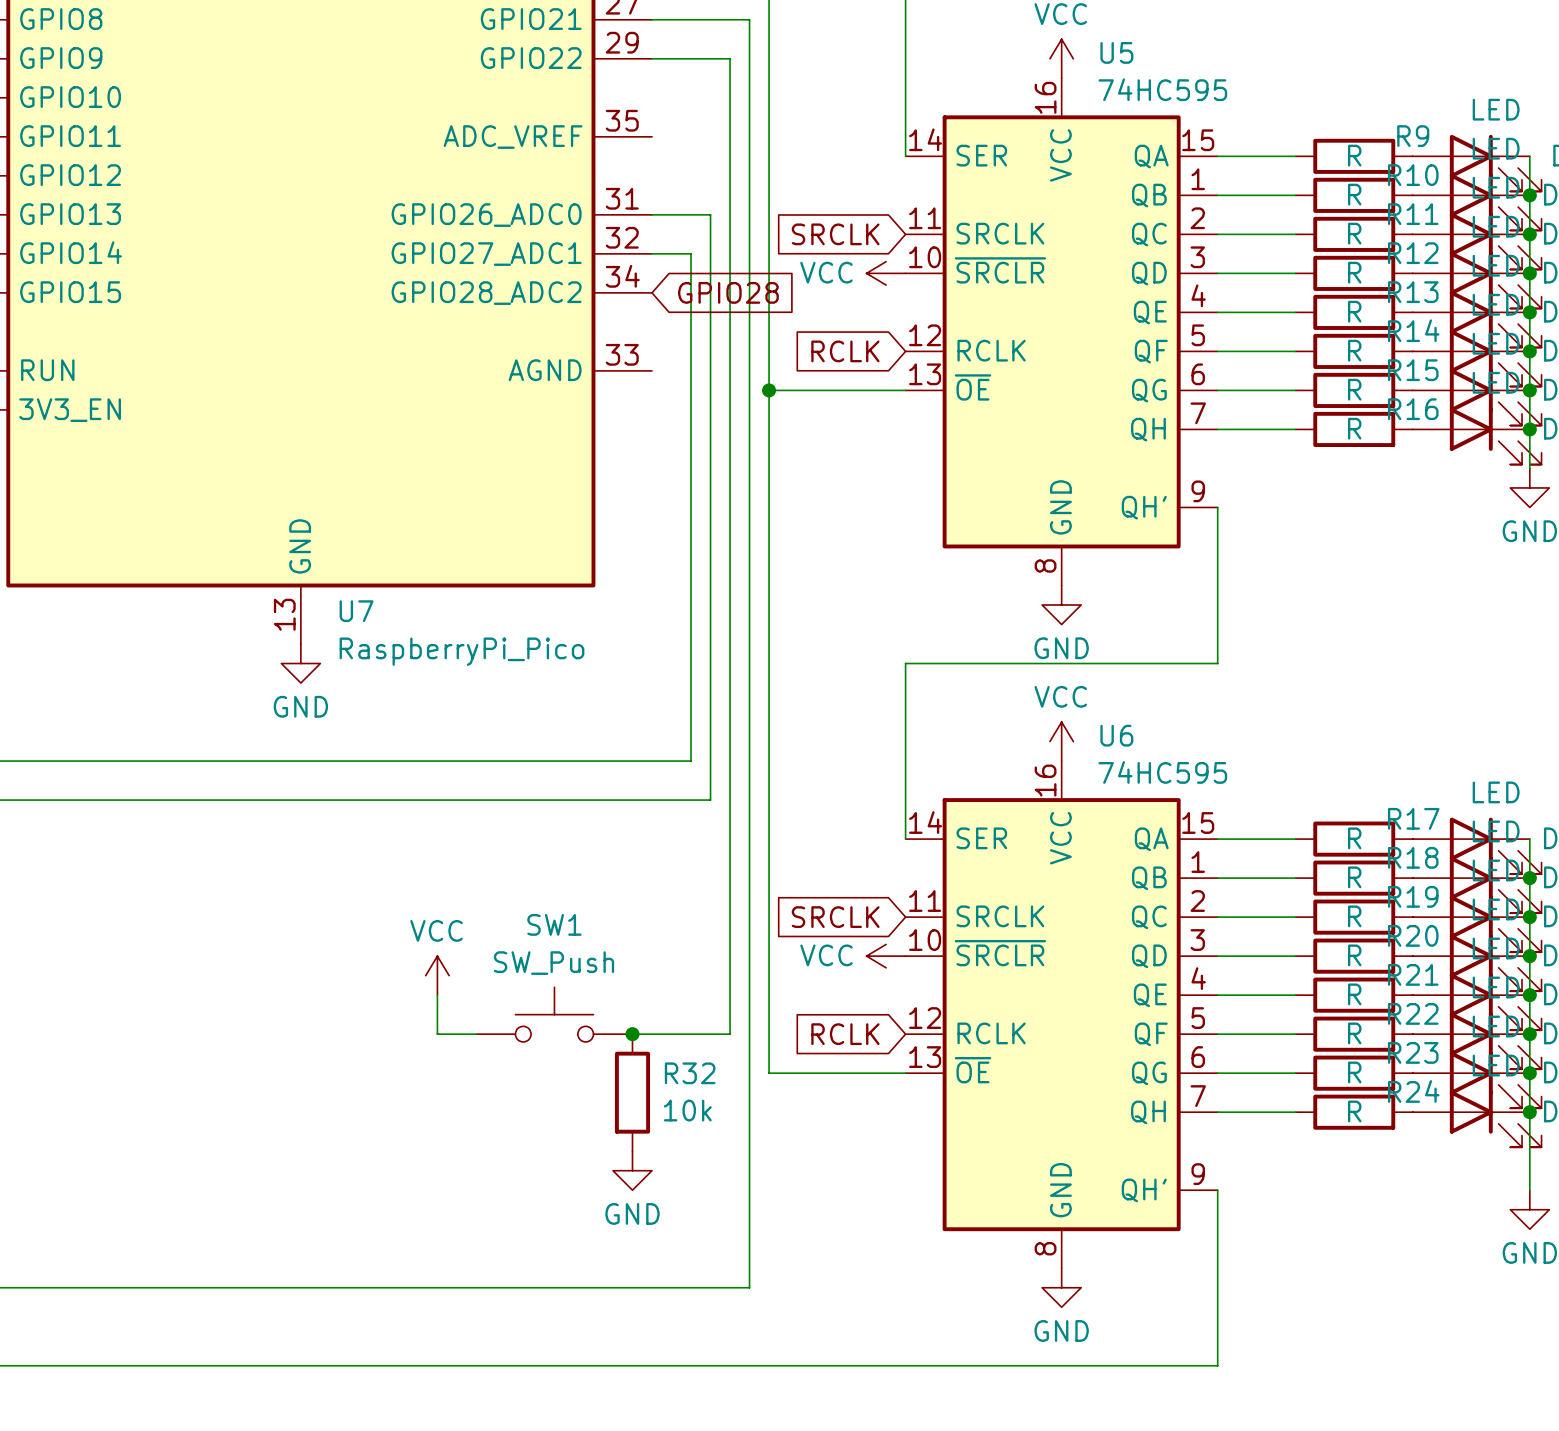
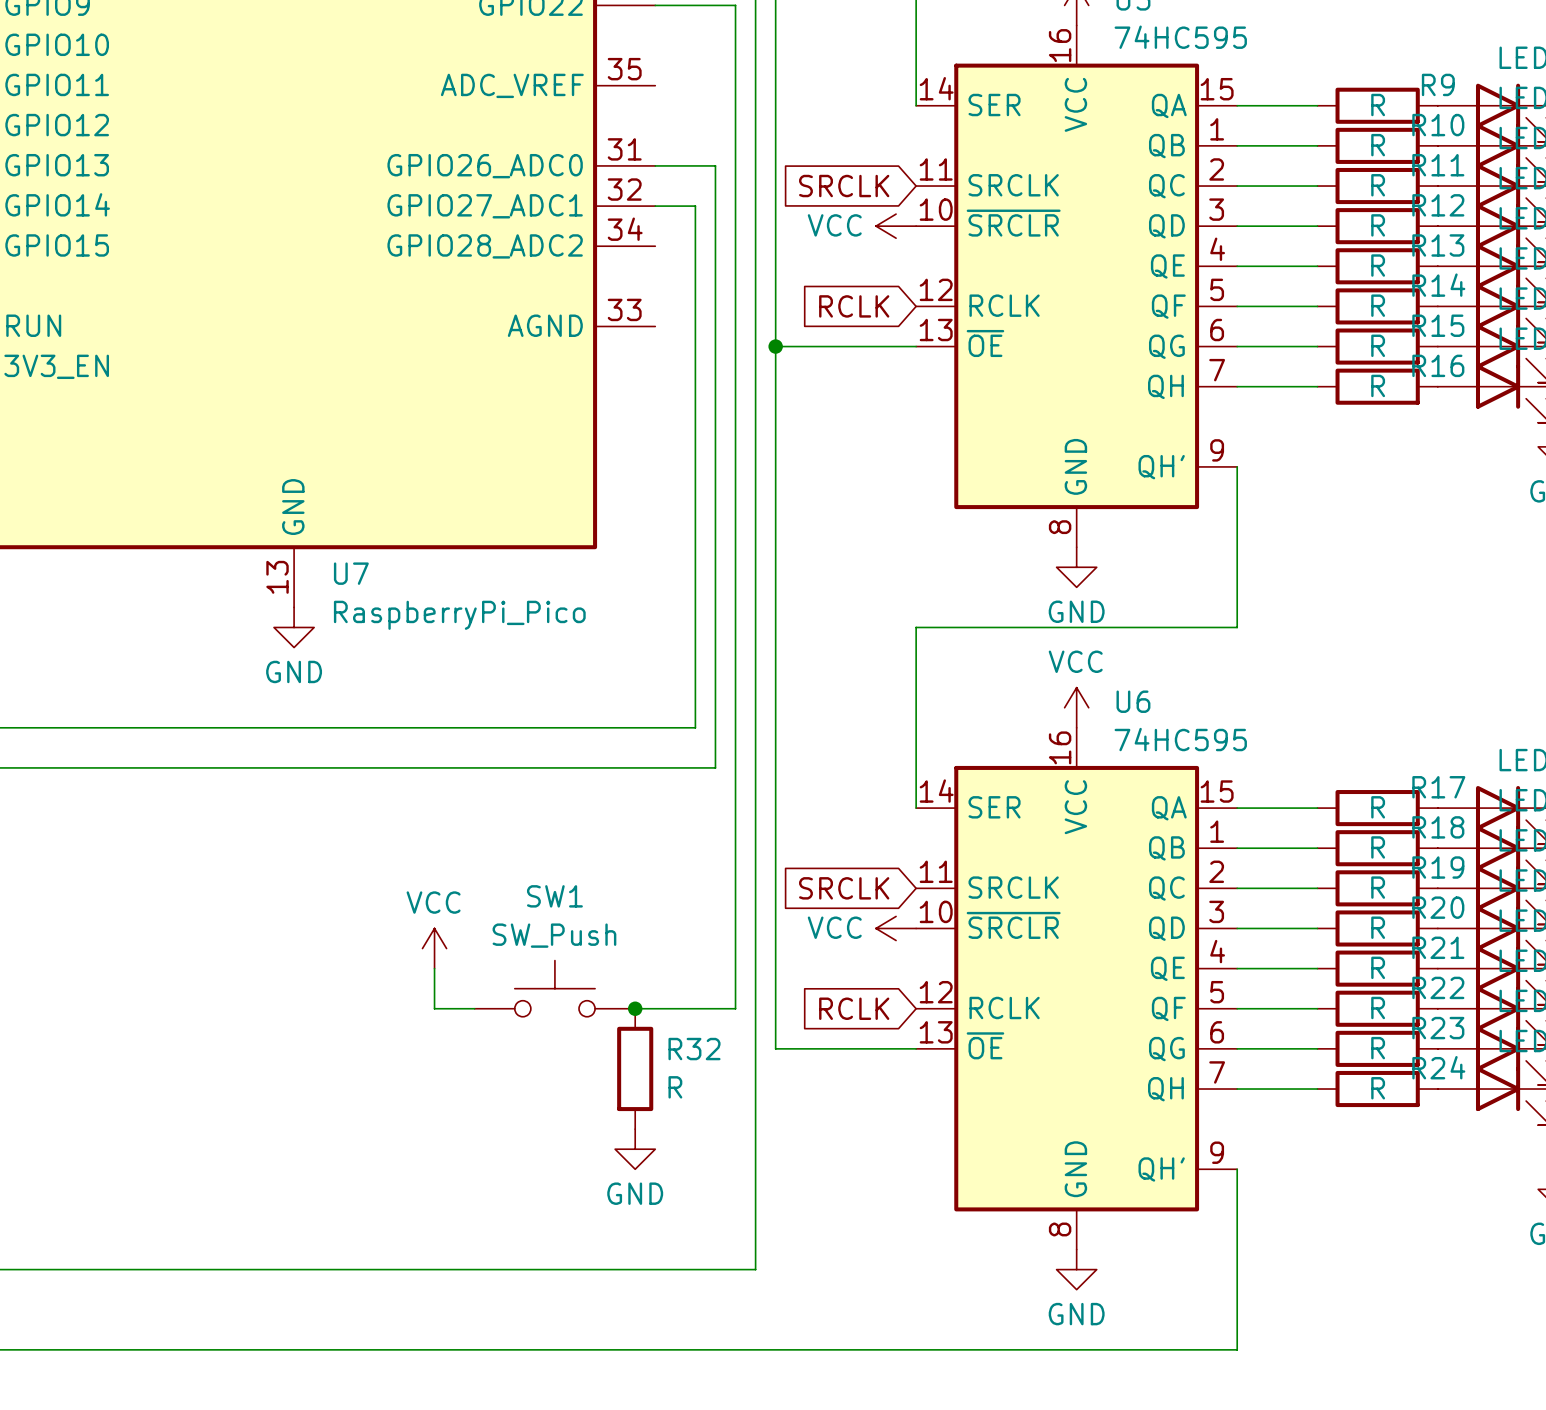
global label: GPIO28 (728, 292) -> none
R32 value: 10k (687, 1110) -> R (675, 1087)

